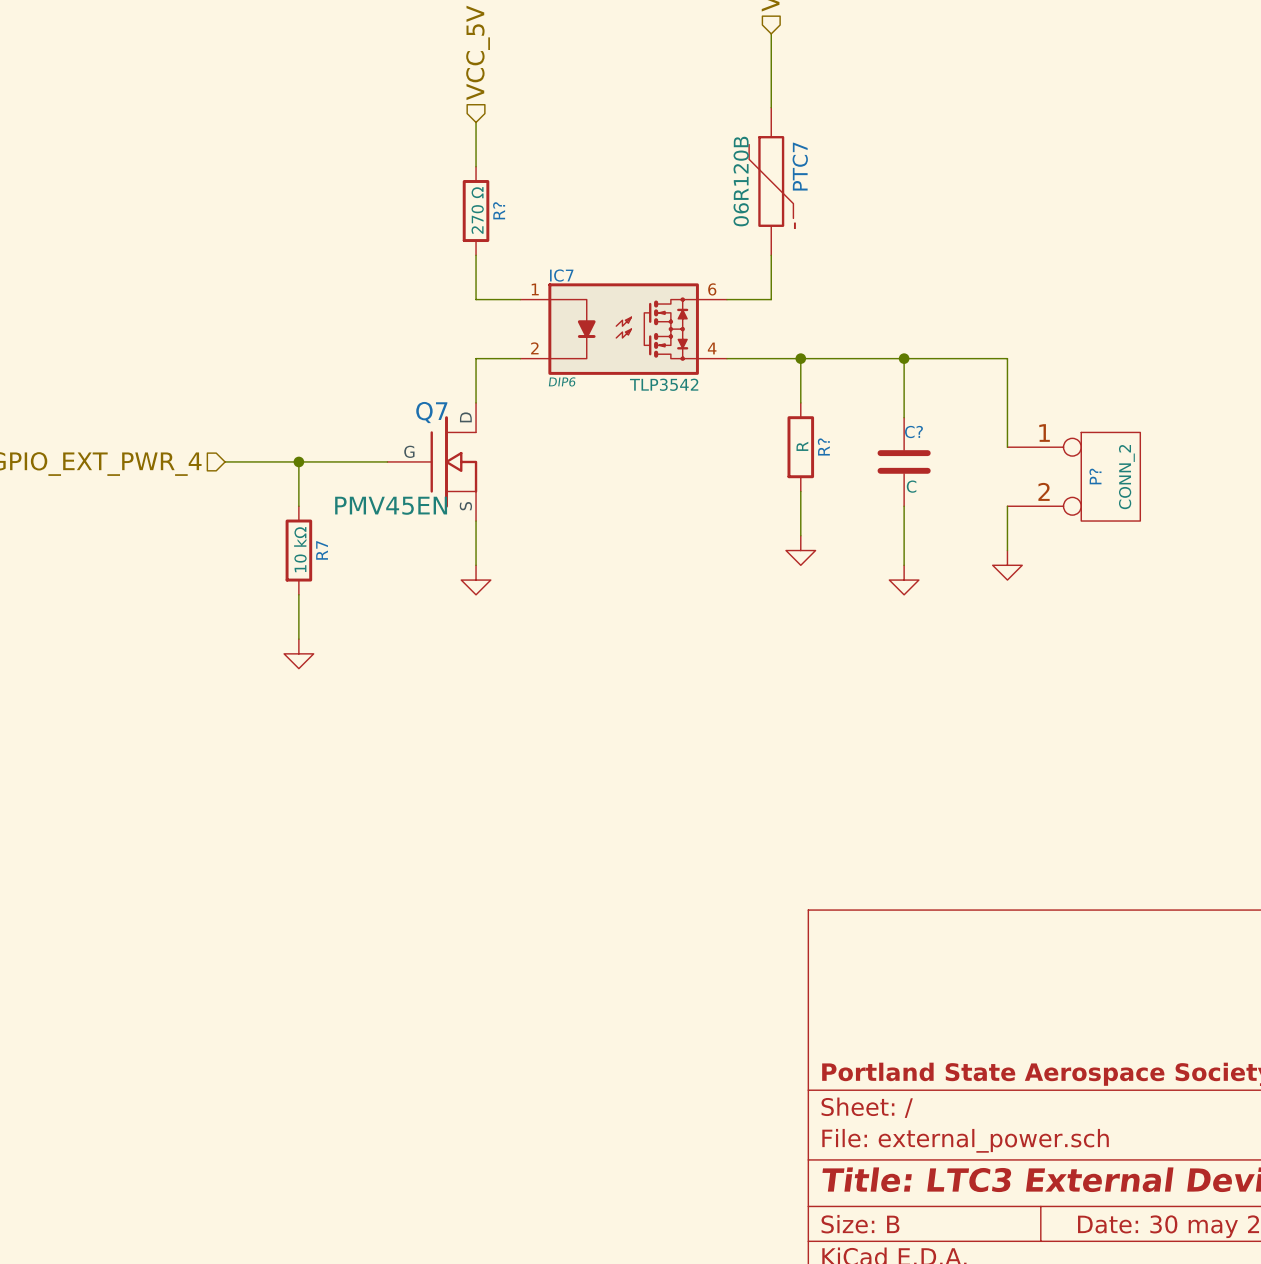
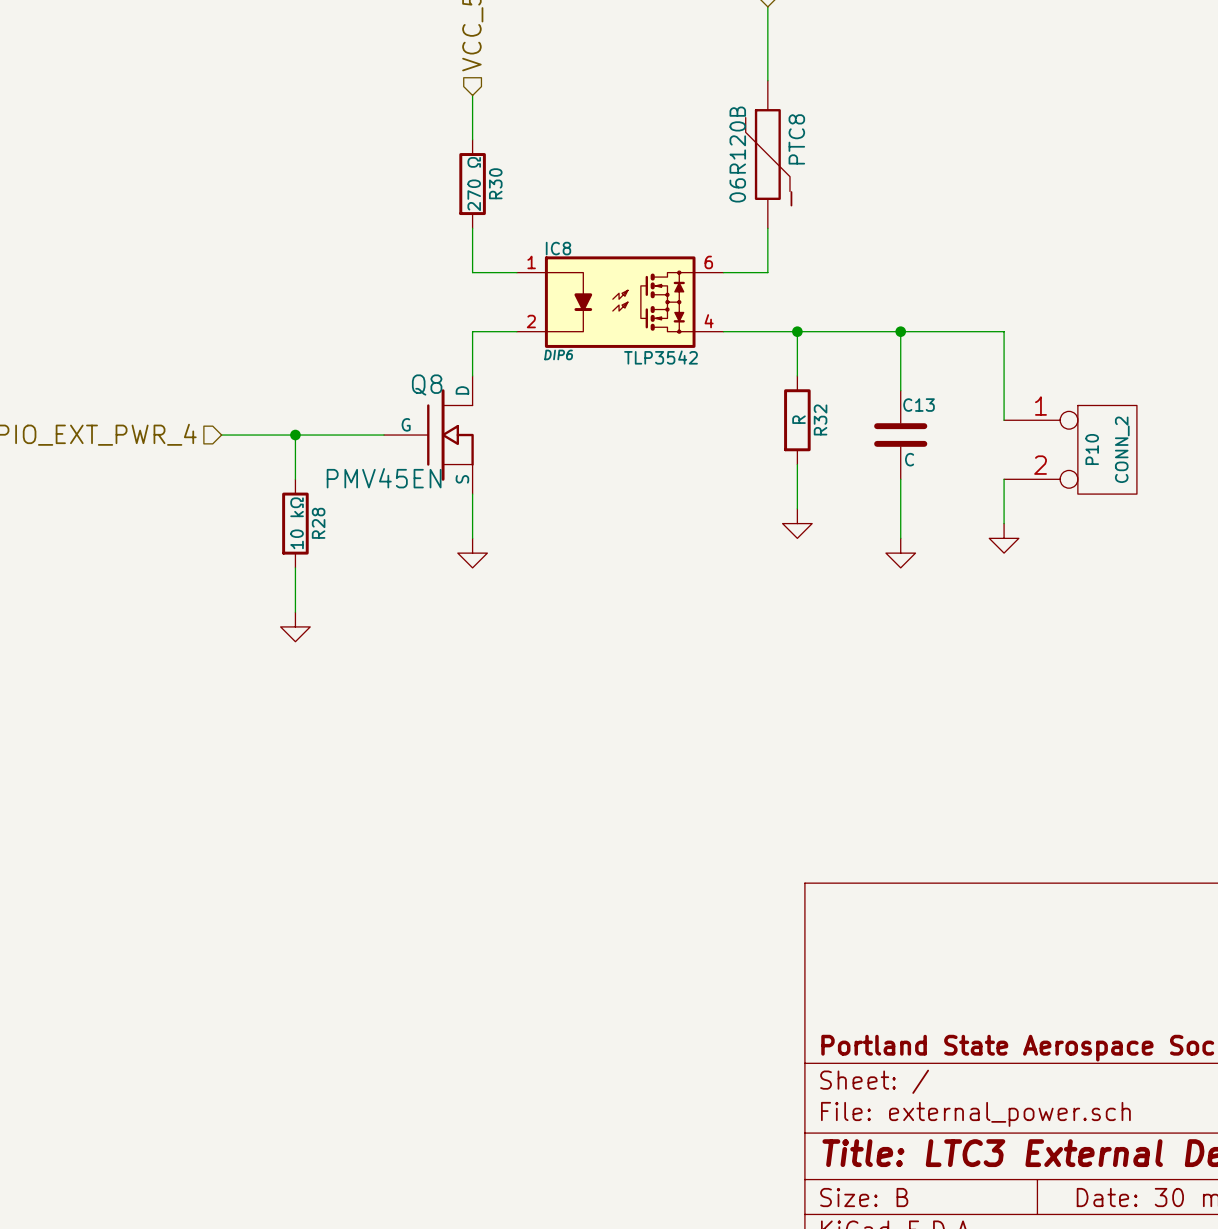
PTC7 name: PTC7 (800, 166) -> PTC8 (796, 139)
R? name: R? (499, 210) -> R30 (495, 183)
IC7 name: IC7 (561, 275) -> IC8 (558, 248)
Q7 name: Q7 (431, 412) -> Q8 (427, 385)
C? name: C? (913, 432) -> C13 (919, 405)
R? name: R? (823, 446) -> R32 (820, 419)
P? name: P? (1095, 476) -> P10 (1092, 449)
R7 name: R7 (322, 550) -> R28 (318, 523)

